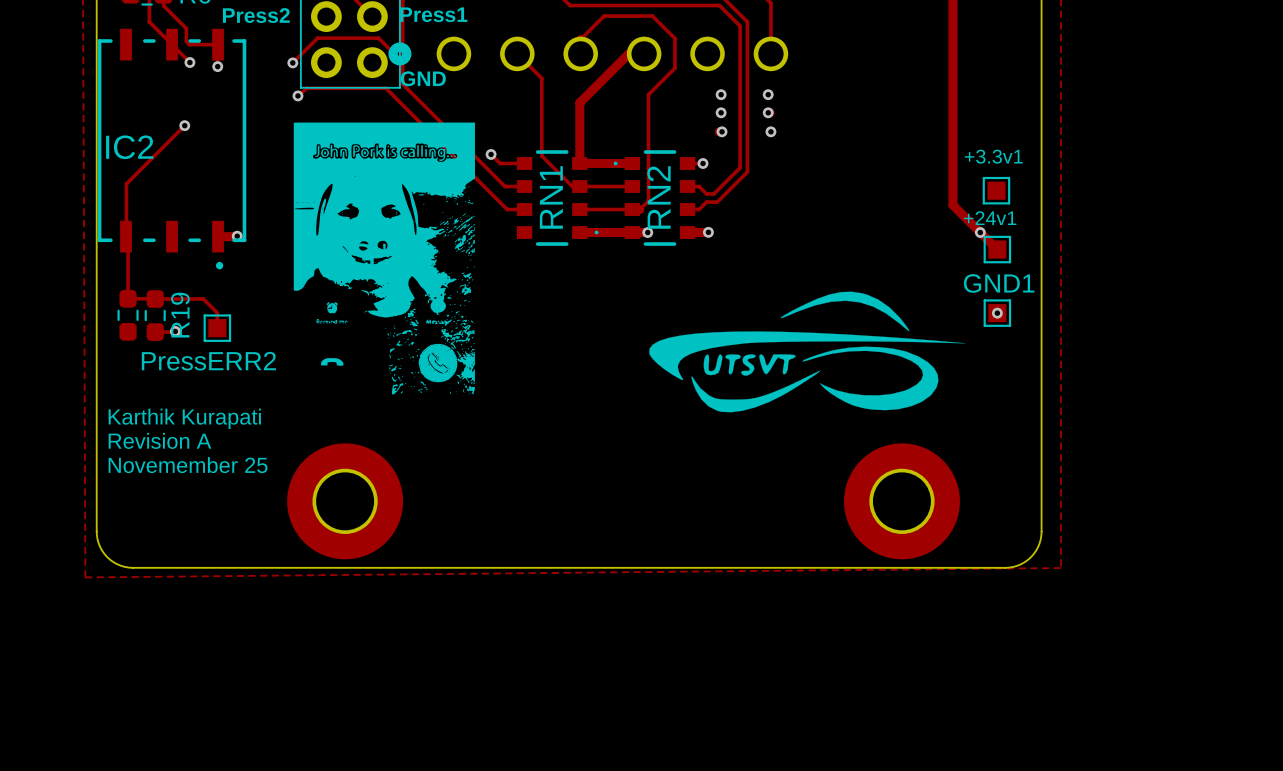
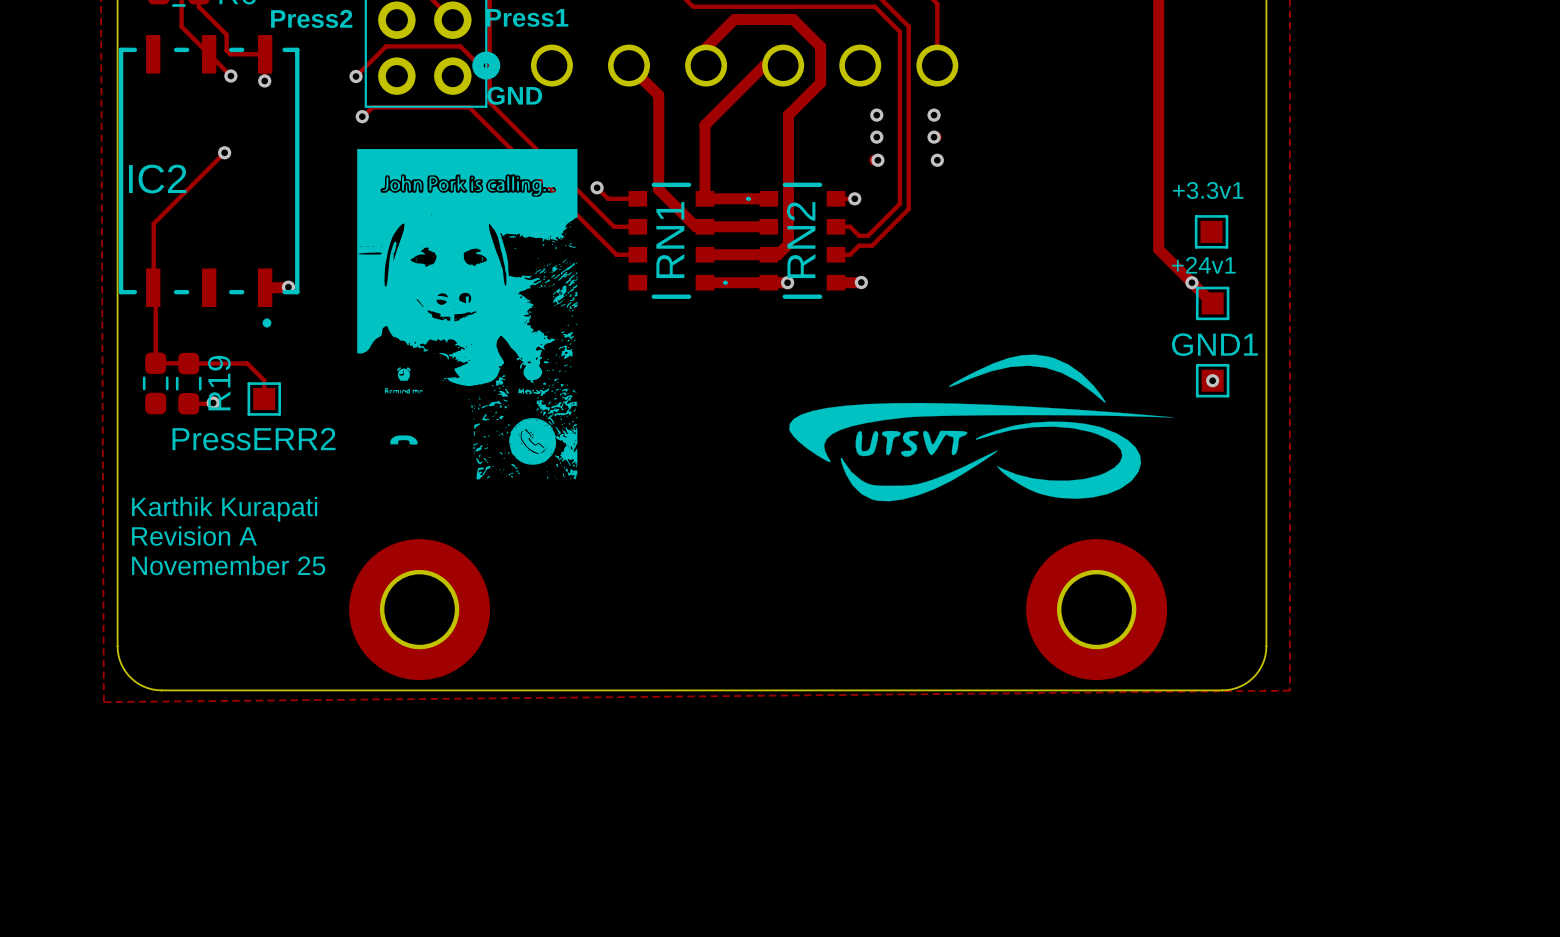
track width: thin (580, 39) (604, 16) (652, 16) (674, 38) (674, 68) (648, 94) (648, 200) (639, 209) -> thick (706, 47) (734, 19) (793, 19) (820, 46) (820, 82) (788, 115) (788, 244) (777, 254)
track width: thin (517, 53) (541, 78) (541, 155) (572, 186) (632, 186) -> thick (629, 65) (658, 95) (658, 189) (695, 226) (768, 226)
track width: thin (579, 209) (632, 209) -> thick (705, 254) (768, 254)

